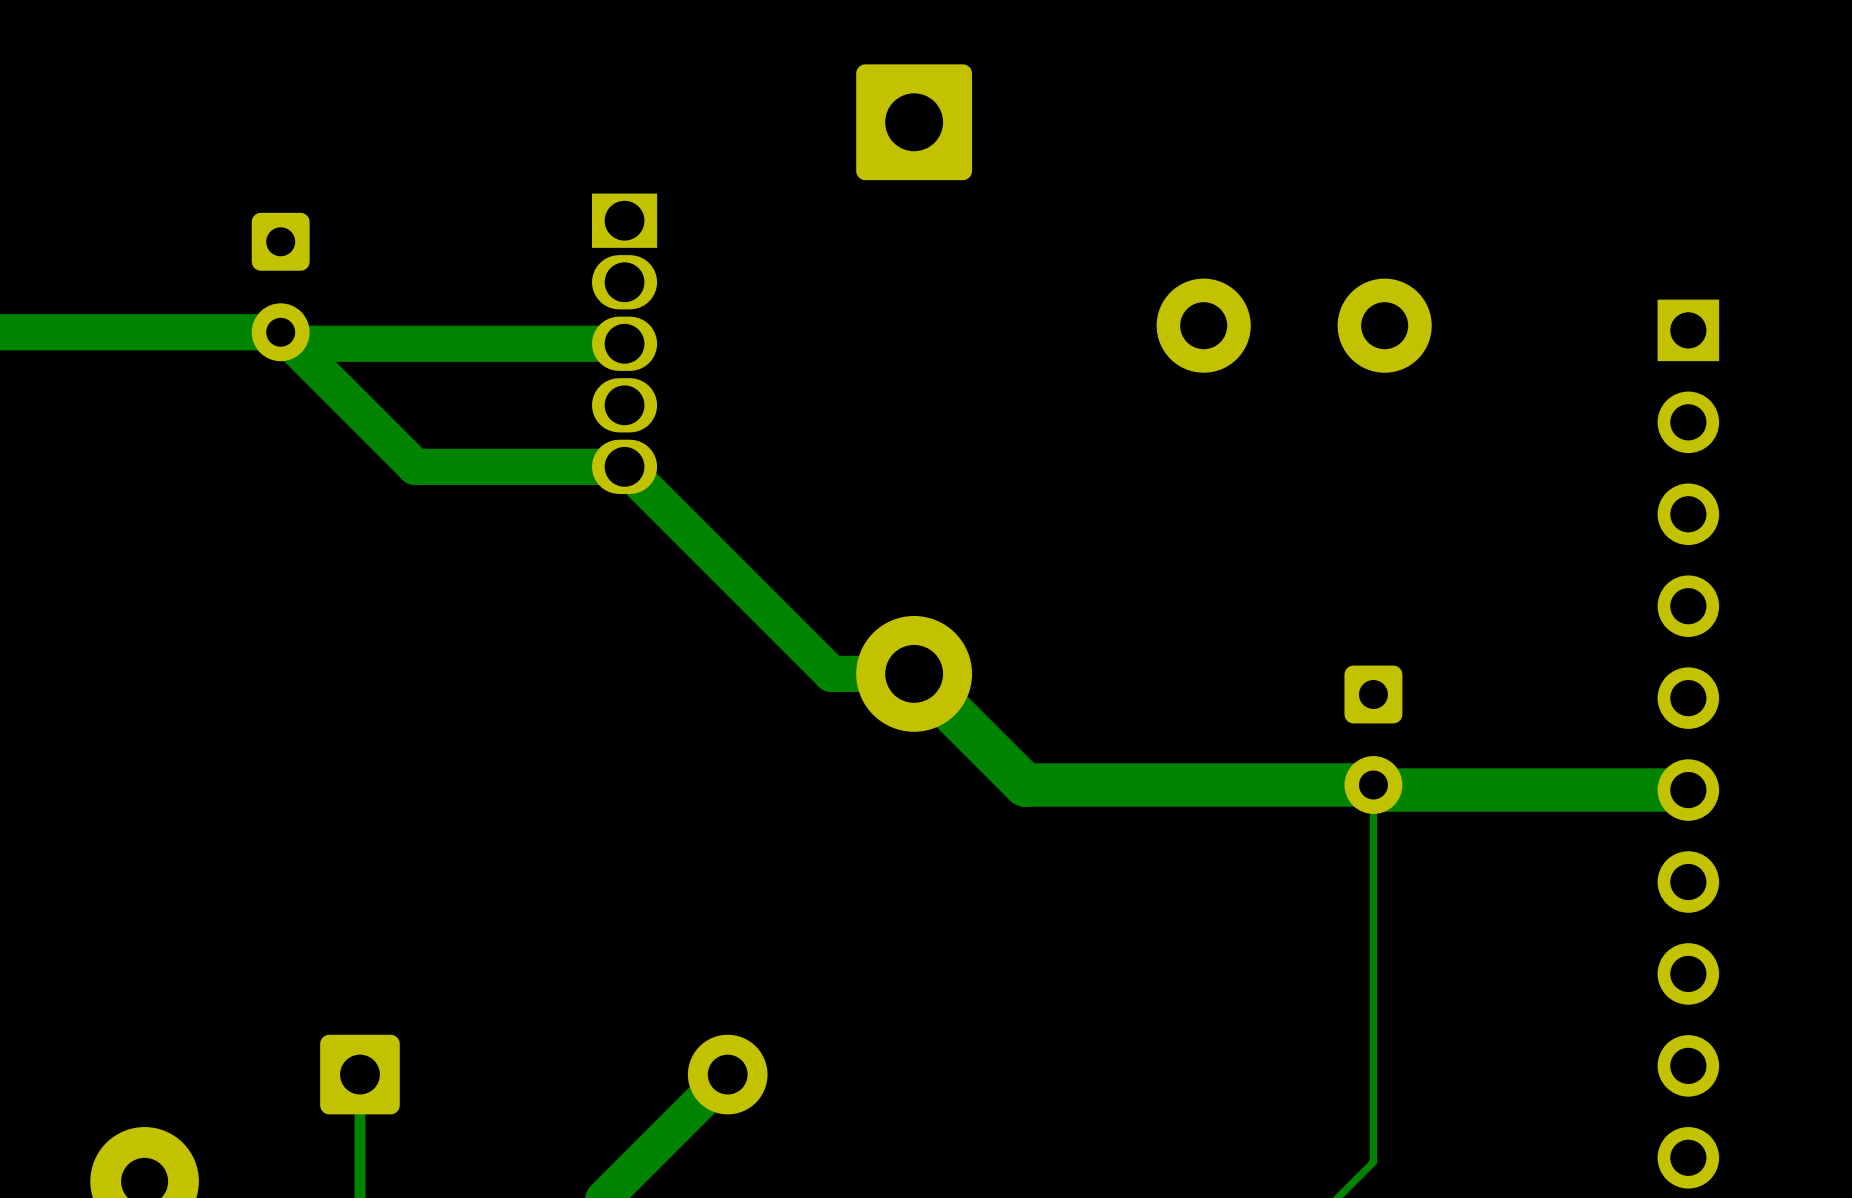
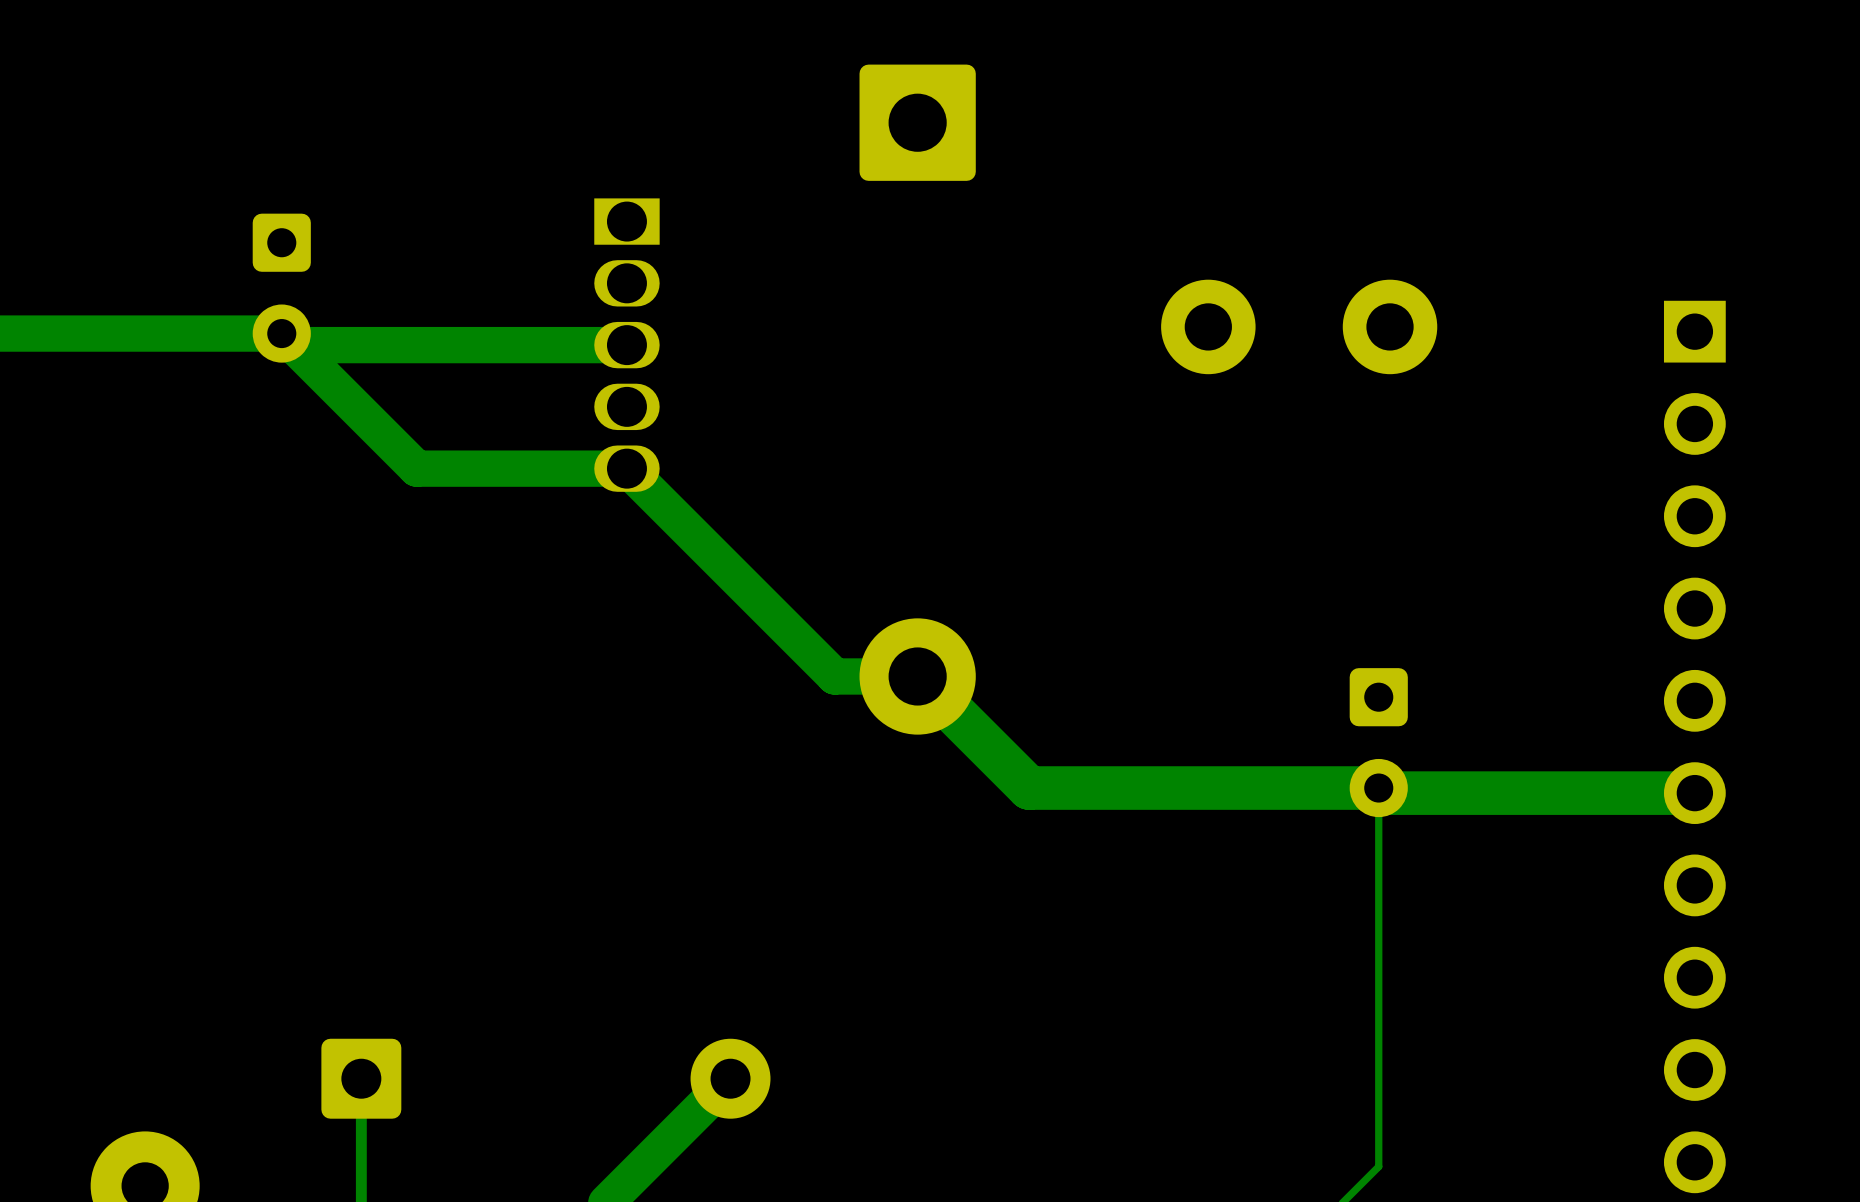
part footprint: [591, 193, 658, 494] -> [594, 198, 660, 492]

